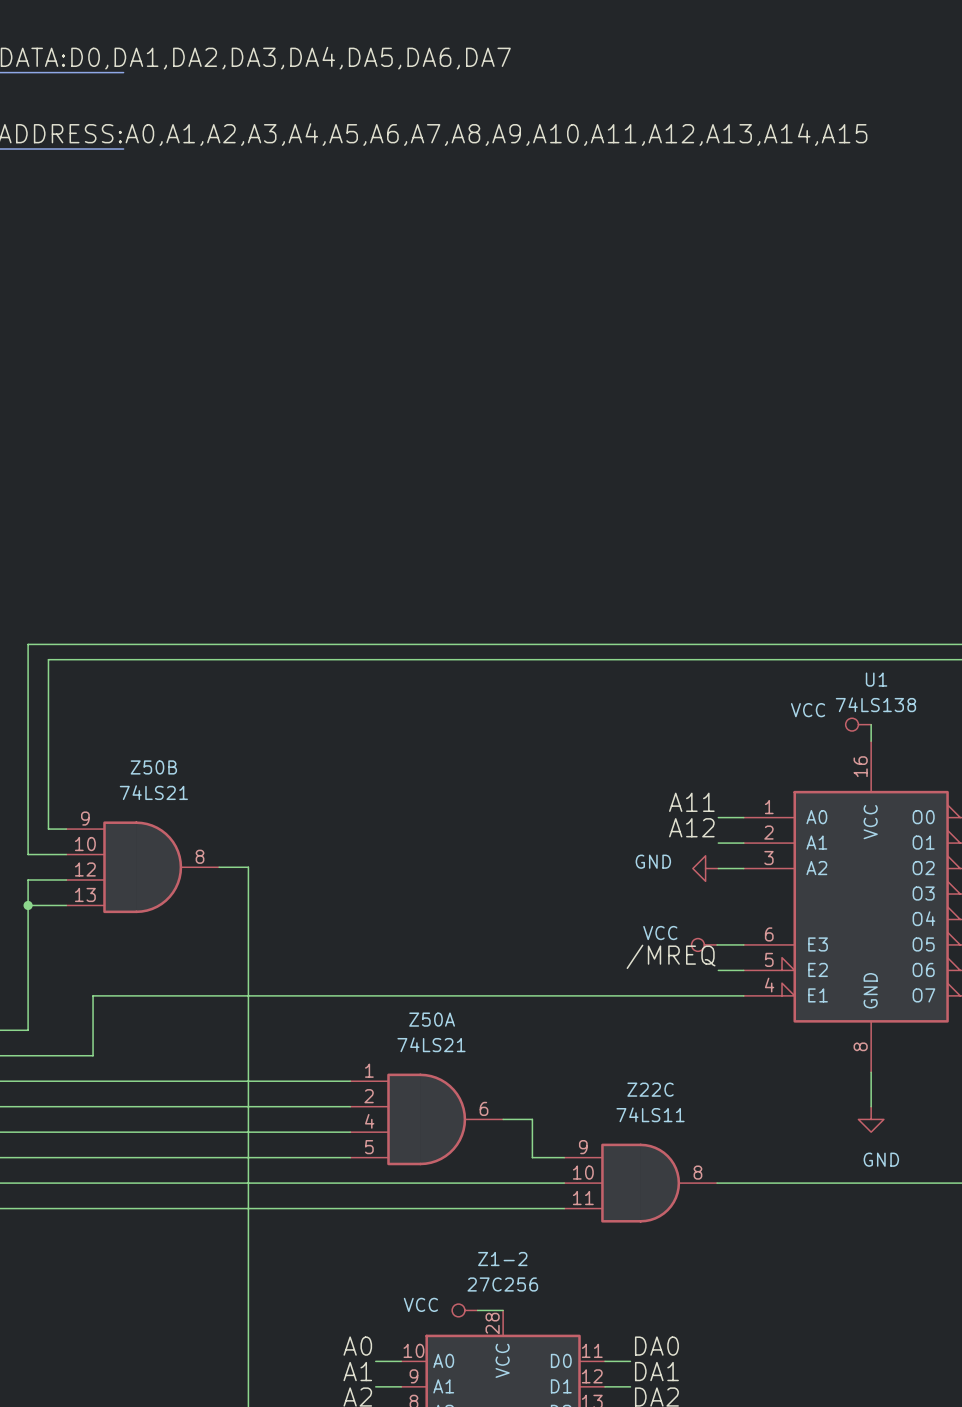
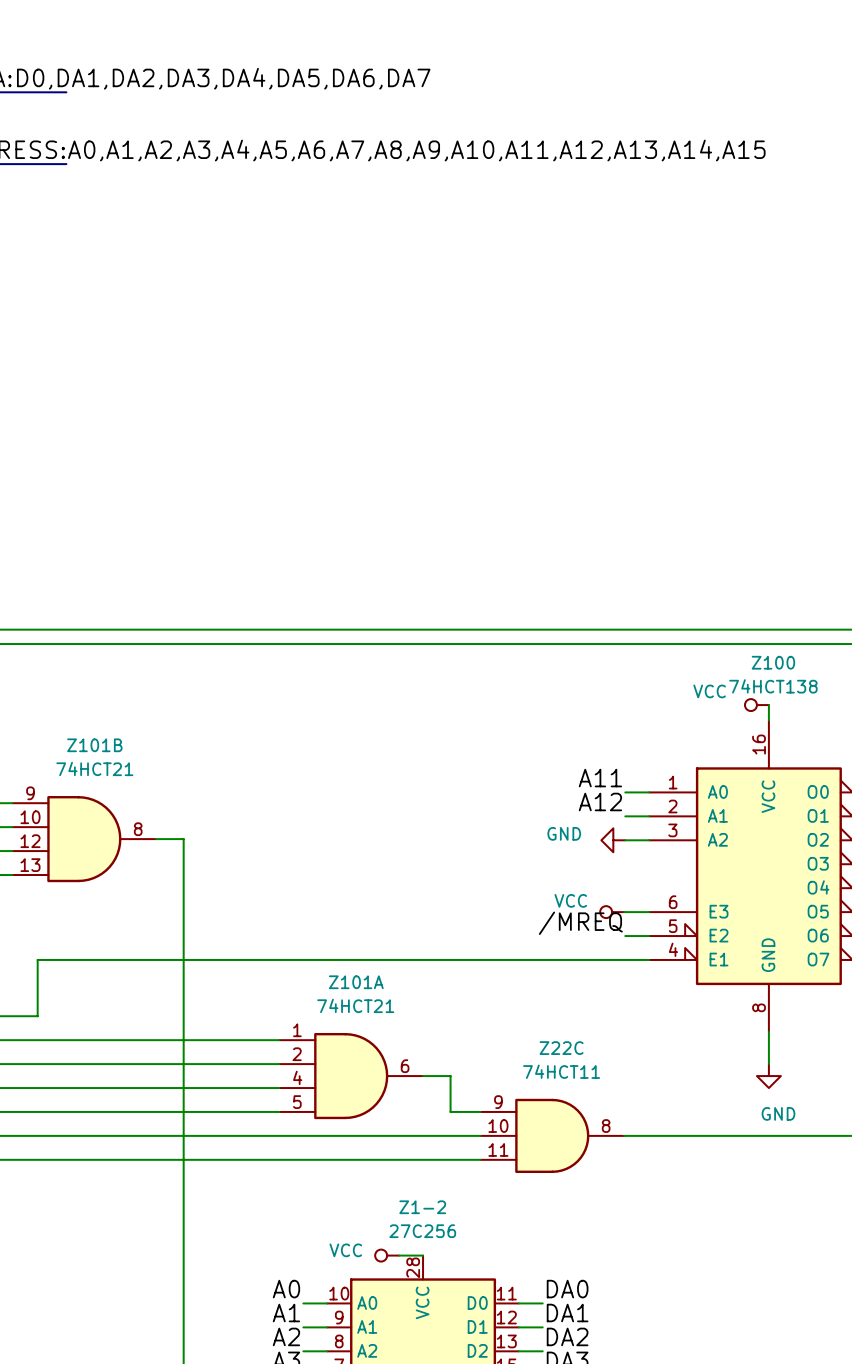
U1 name: U1 (876, 679) -> Z100 (773, 662)
U1 value: 74LS138 (875, 704) -> 74HCT138 (773, 686)
Z50B name: Z50B (153, 767) -> Z101B (94, 745)
Z50B value: 74LS21 (153, 792) -> 74HCT21 (94, 768)
Z50A name: Z50A (432, 1019) -> Z101A (356, 982)
Z50A value: 74LS21 (431, 1044) -> 74HCT21 (355, 1005)
Z22C value: 74LS11 (650, 1114) -> 74HCT11 (561, 1071)

